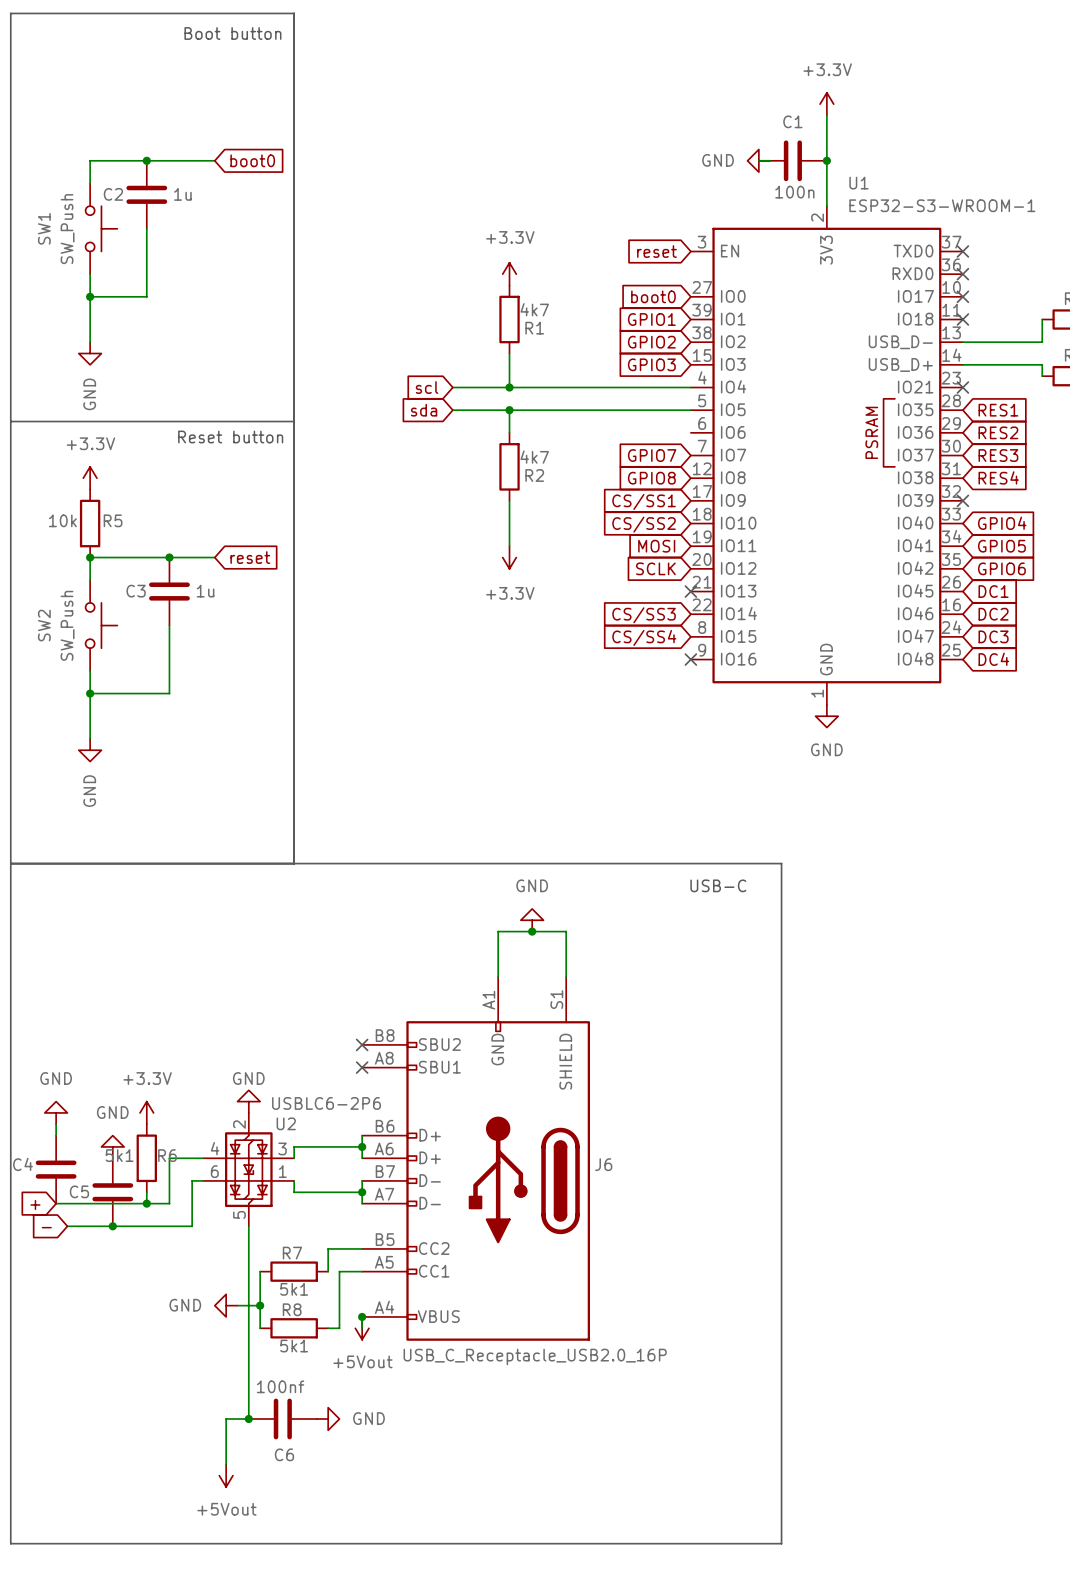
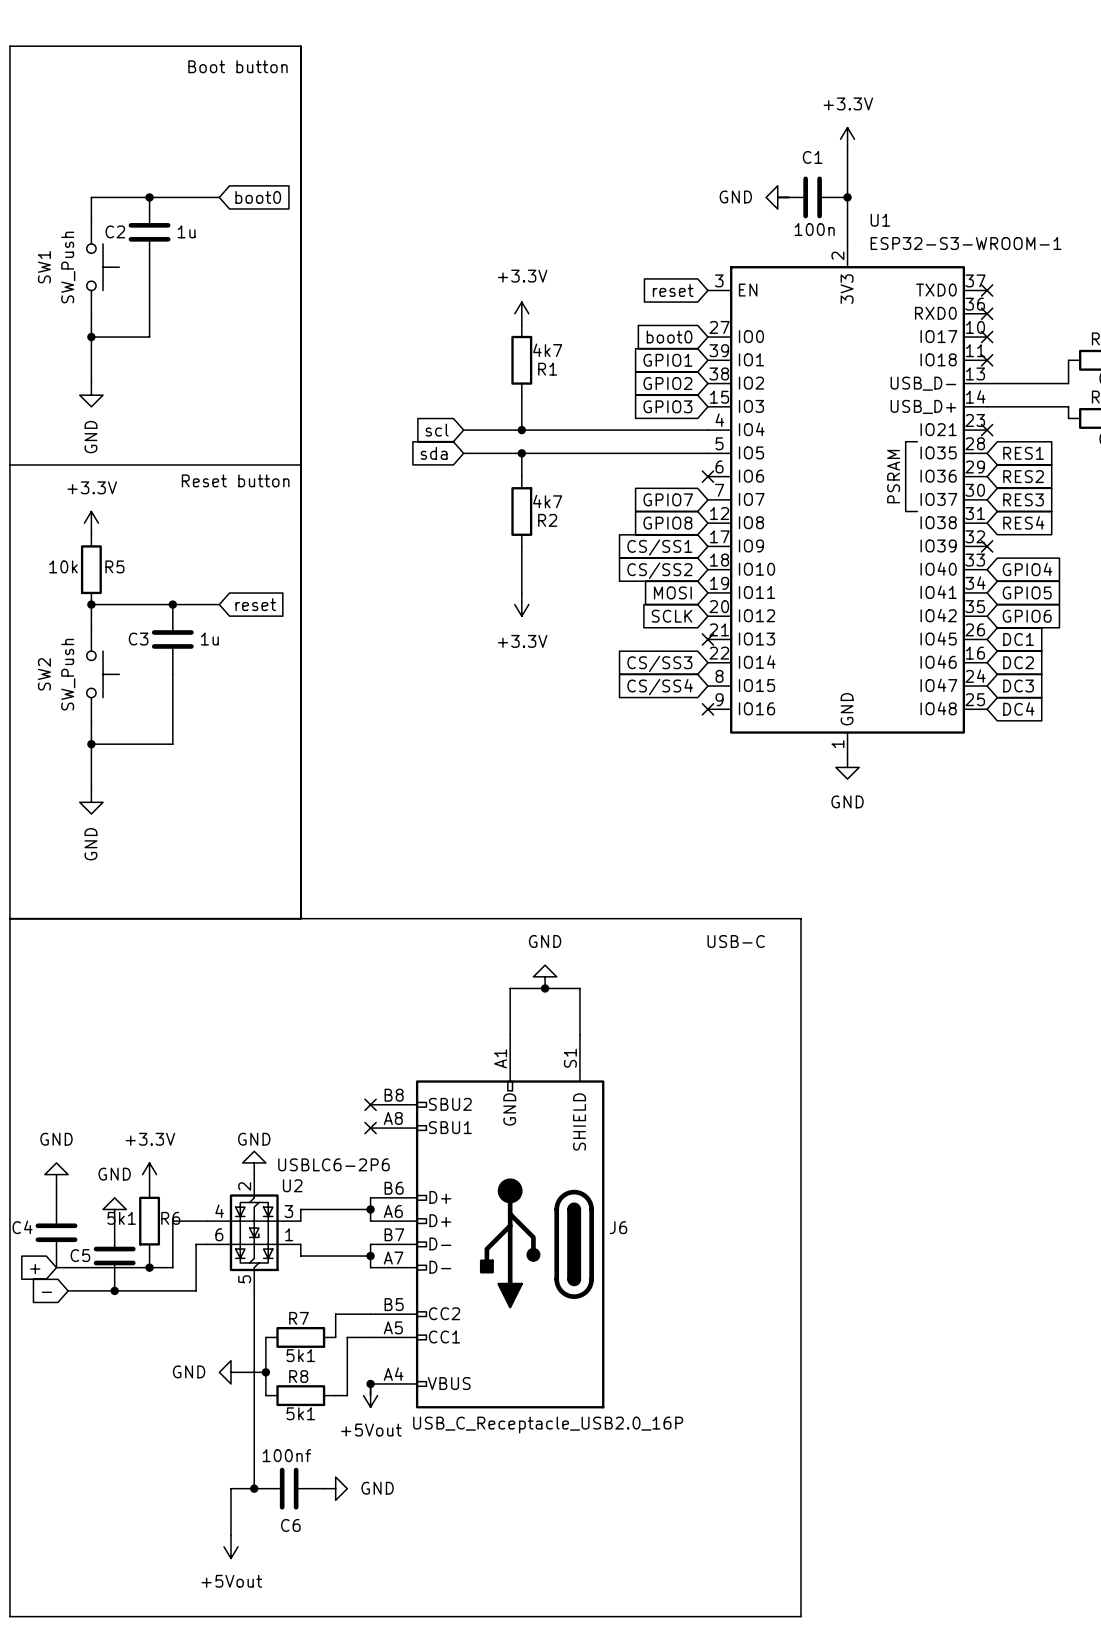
no-connect mark: none -> (707, 476)

